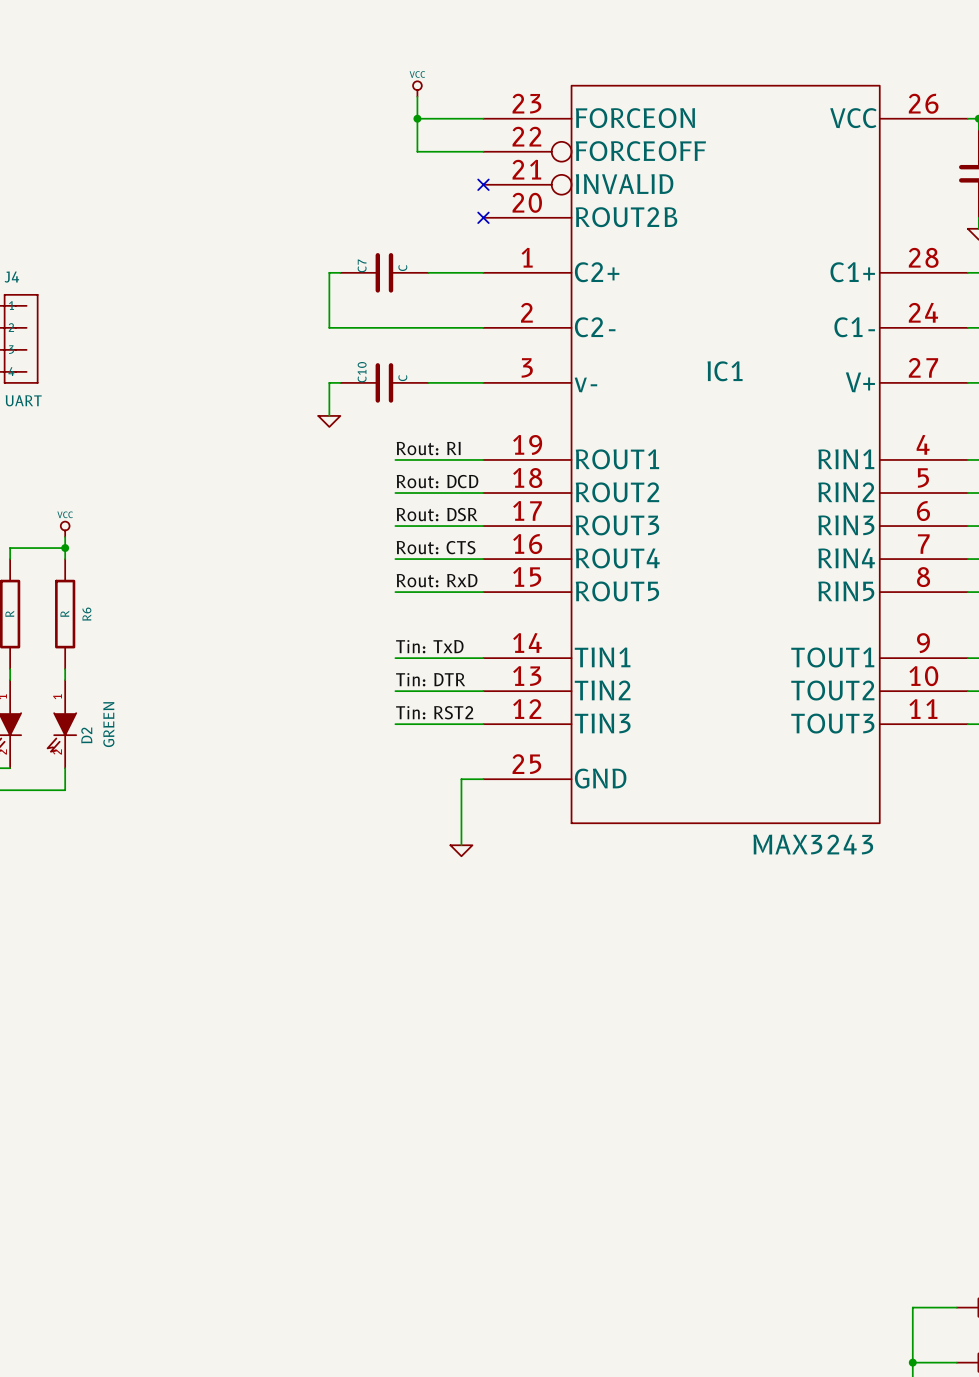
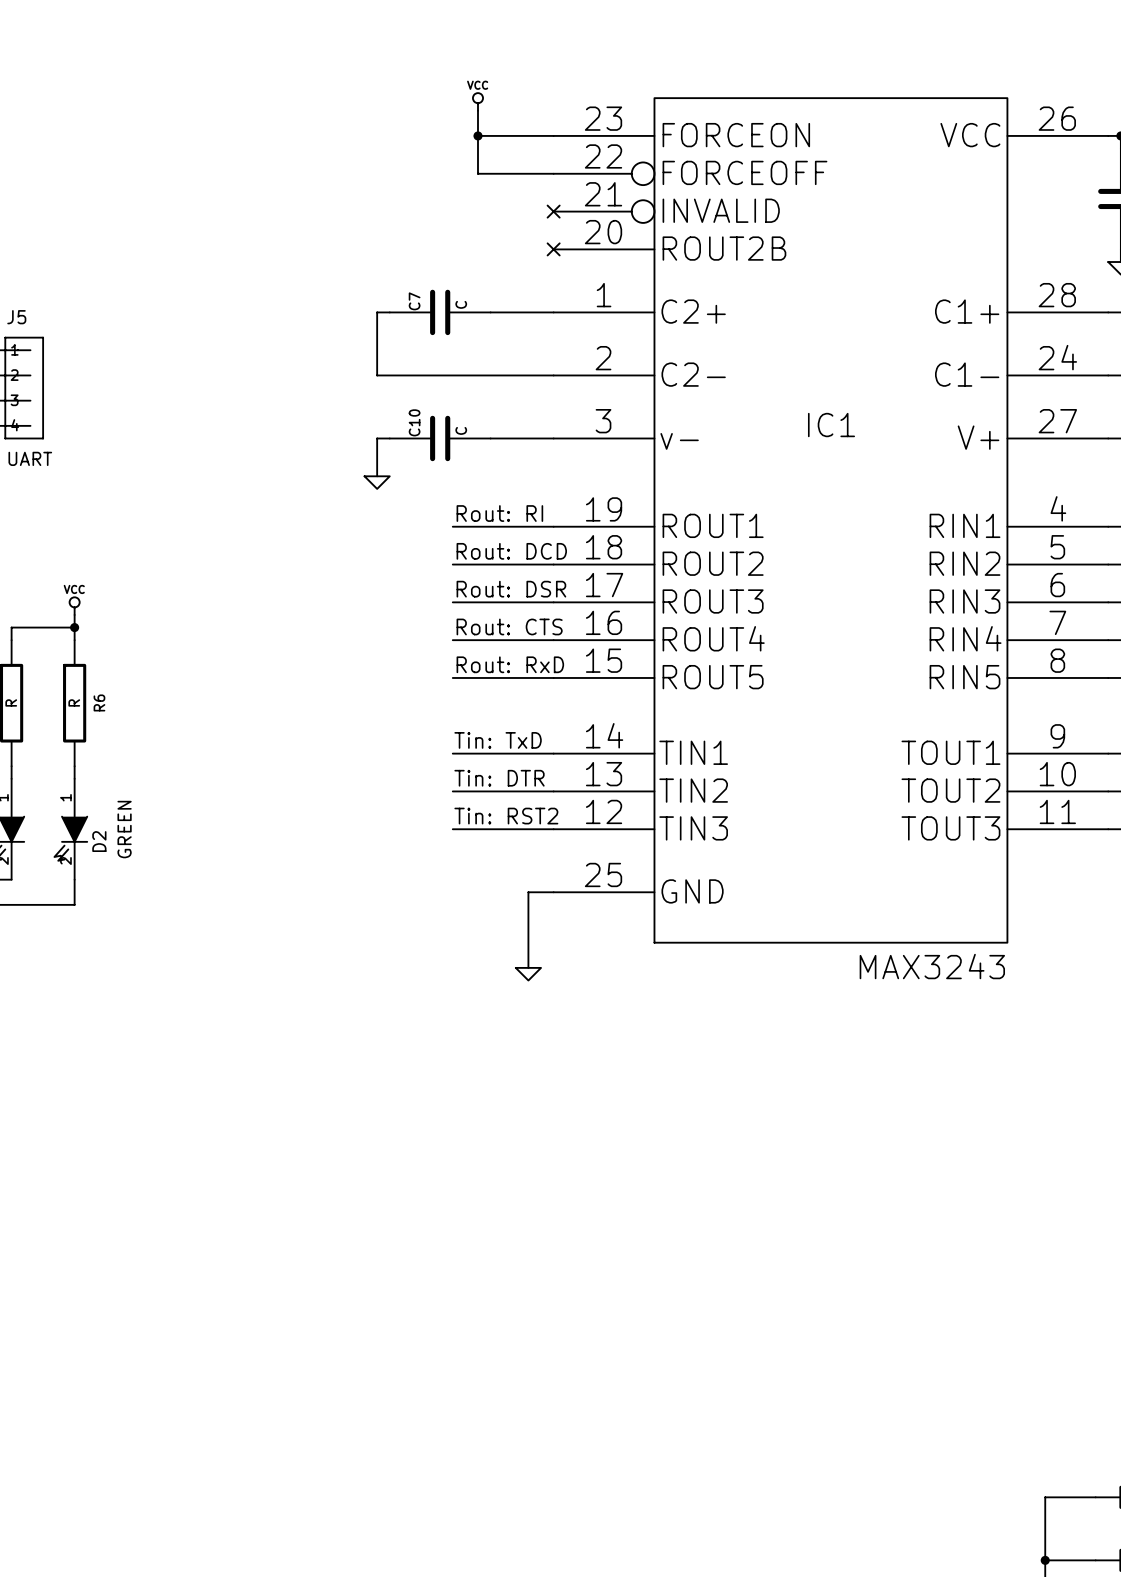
J4 name: J4 (11, 277) -> J5 (16, 317)

